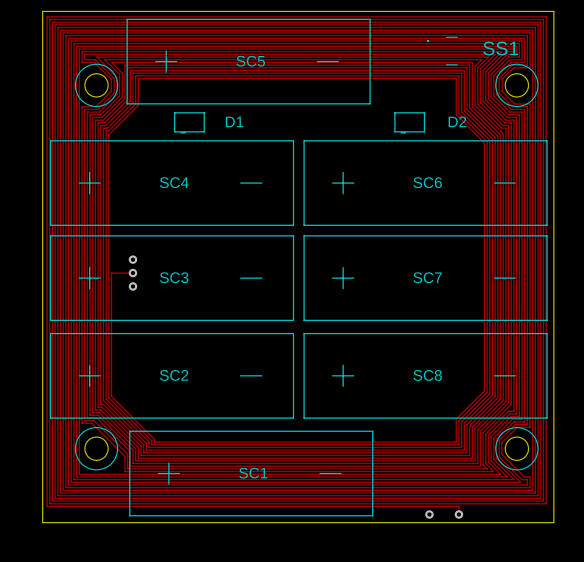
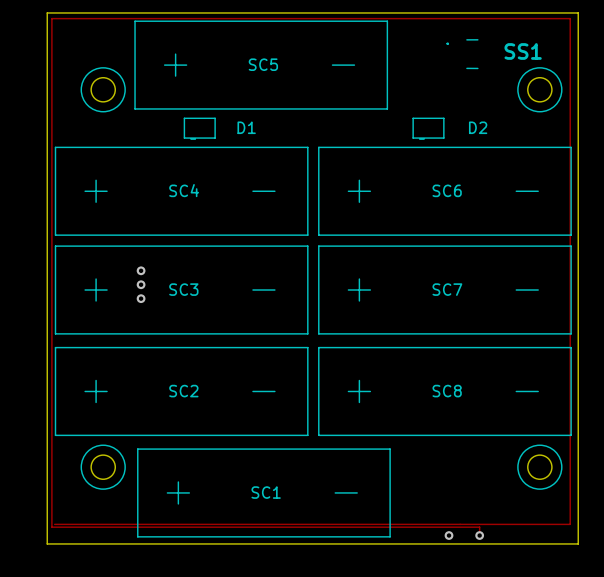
track: (513, 67) (530, 67) (530, 32) (63, 32) (63, 490) (532, 490) (532, 30) (60, 30) (60, 493) (535, 493) (535, 27) (57, 27) (57, 495) (538, 495) (538, 24) (55, 24) (55, 498) (540, 498) (540, 22) (52, 22) (52, 501) (543, 501) (543, 19) (49, 19) (49, 503) -> none
track: (513, 67) (502, 79) (502, 91) (514, 104) (530, 104) (530, 427) (517, 427) (501, 442) (501, 454) (524, 476) (530, 476) (530, 487) (65, 487) (65, 35) (527, 35) (527, 65) (512, 65) (499, 78) (499, 93) (512, 106) (527, 106) (527, 424) (515, 424) (499, 440) (499, 456) (521, 479) (527, 479) (527, 484) (68, 484) (68, 38) (524, 38) (524, 62) (511, 62) (496, 77) (496, 94) (511, 109) (524, 109) (524, 421) (513, 421) (496, 439) (496, 458) (520, 482) (71, 482) (71, 40) (521, 40) (521, 59) (509, 59) (493, 75) (493, 95) (509, 112) (521, 112) (521, 419) (512, 419) (493, 438) (493, 459) (513, 479) (73, 479) (73, 43) (519, 43) (519, 57) (508, 57) (491, 74) (491, 97) (508, 114) (519, 114) (519, 416) (511, 416) (491, 436) (491, 460) (507, 476) (76, 476) (76, 46) (516, 46) (516, 54) (507, 54) (488, 73) (488, 98) (507, 117) (516, 117) (516, 413) (509, 413) (488, 435) (488, 462) (500, 474) (79, 474) (79, 49) (513, 49) (513, 51) (505, 51) (485, 71) (485, 100) (505, 120) (513, 120) (513, 411) (508, 411) (485, 434) (485, 463) (493, 471) (124, 471) (124, 456) (91, 423) (82, 423) (82, 106) (95, 106) (111, 91) (111, 79) (94, 62) (82, 62) (82, 51) (501, 51) (483, 70) (483, 101) (504, 122) (511, 122) (511, 404) (483, 432) (483, 464) (487, 468) (127, 468) (127, 454) (94, 420) (84, 420) (84, 109) (98, 109) (114, 93) (114, 78) (95, 59) (84, 59) (84, 54) (495, 54) (480, 69) (480, 102) (503, 125) (508, 125) (508, 403) (480, 431) (480, 466) (130, 466) (130, 451) (96, 417) (87, 417) (87, 112) (99, 112) (116, 94) (116, 77) (96, 57) (488, 57) (477, 67) (477, 104) (501, 128) (505, 128) (505, 401) (477, 430) (477, 463) (132, 463) (132, 450) (98, 415) (90, 415) (90, 114) (100, 114) (119, 95) (119, 74) (104, 59) (481, 59) (475, 66) (475, 105) (503, 133) (503, 400) (475, 428) (475, 460) (135, 460) (135, 448) (99, 412) (92, 412) (92, 117) (102, 117) (122, 97) (122, 73) (111, 62) (472, 62) (472, 106) (500, 134) (500, 399) (472, 427) (472, 458) (138, 458) (138, 447) (100, 409) (95, 409) (95, 120) (103, 120) (124, 98) (124, 65) (469, 65) (469, 108) (497, 136) (497, 397) (469, 425) (469, 455) (141, 455) (141, 446) (102, 407) (98, 407) (98, 122) (104, 122) (127, 100) (127, 67) (466, 67) (466, 109) (495, 137) (495, 396) (466, 424) (466, 452) (143, 452) (143, 444) (103, 404) (100, 404) (100, 125) (106, 125) (130, 101) (130, 70) (464, 70) (464, 110) (492, 138) (492, 395) (464, 423) (464, 450) (146, 450) (146, 443) (103, 400) (103, 128) (107, 128) (132, 102) (132, 73) (461, 73) (461, 112) (489, 140) (489, 393) (461, 421) (461, 447) (149, 447) (149, 442) (106, 399) (106, 130) (108, 130) (135, 104) (135, 75) (458, 75) (458, 113) (487, 141) (487, 392) (458, 420) (458, 444) (151, 444) (151, 440) (108, 397) (108, 134) (138, 105) (138, 78) (456, 78) (456, 114) (484, 142) (484, 391) (456, 419) (456, 442) (154, 442) (154, 439) (111, 396) (111, 273) (132, 273) -> none

